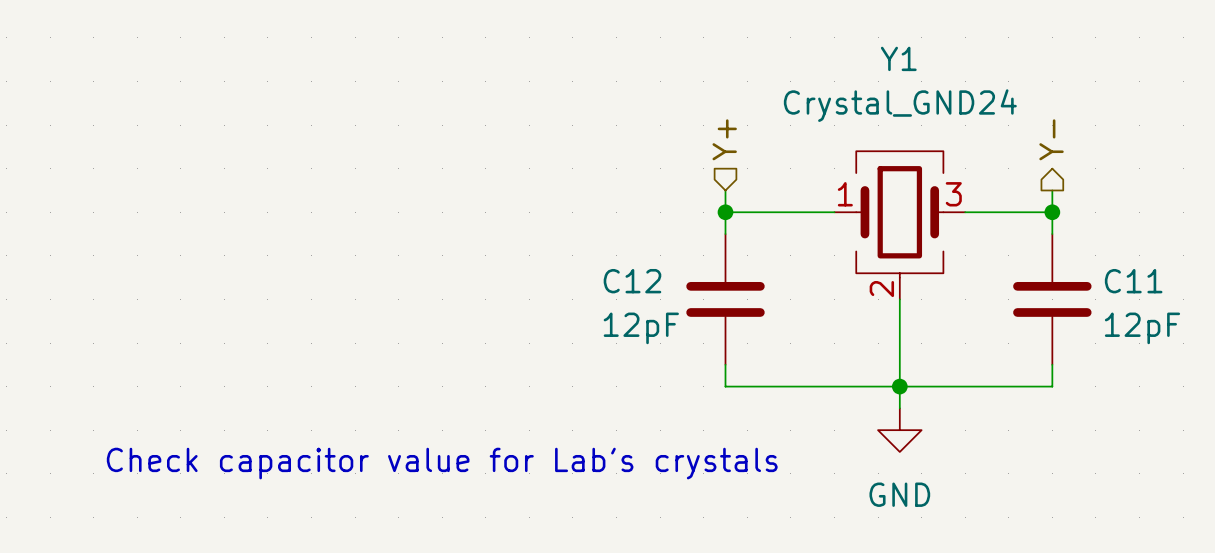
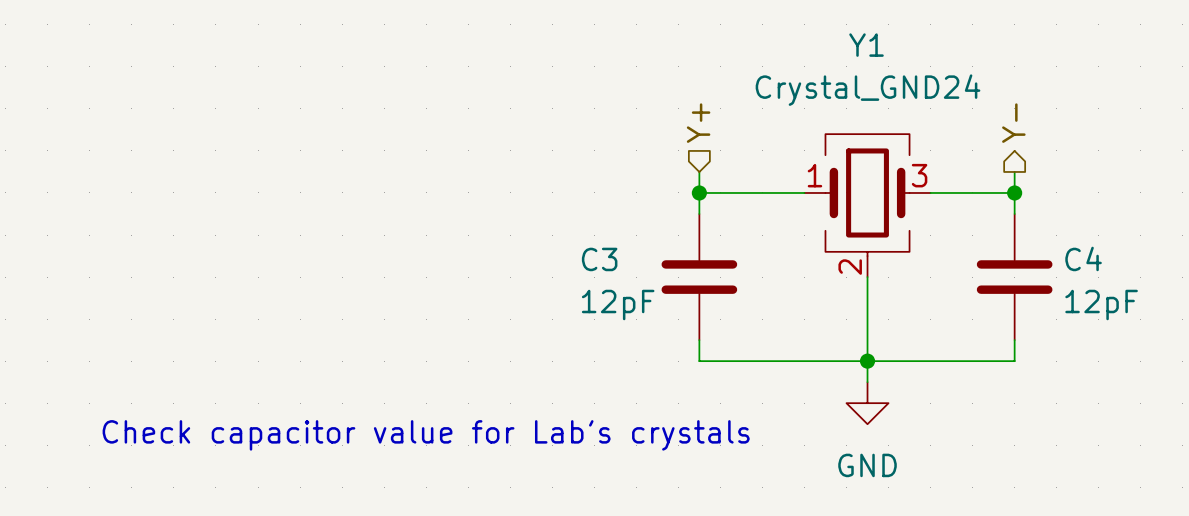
C12 name: C12 (632, 281) -> C3 (599, 259)
C11 name: C11 (1133, 281) -> C4 (1083, 258)

